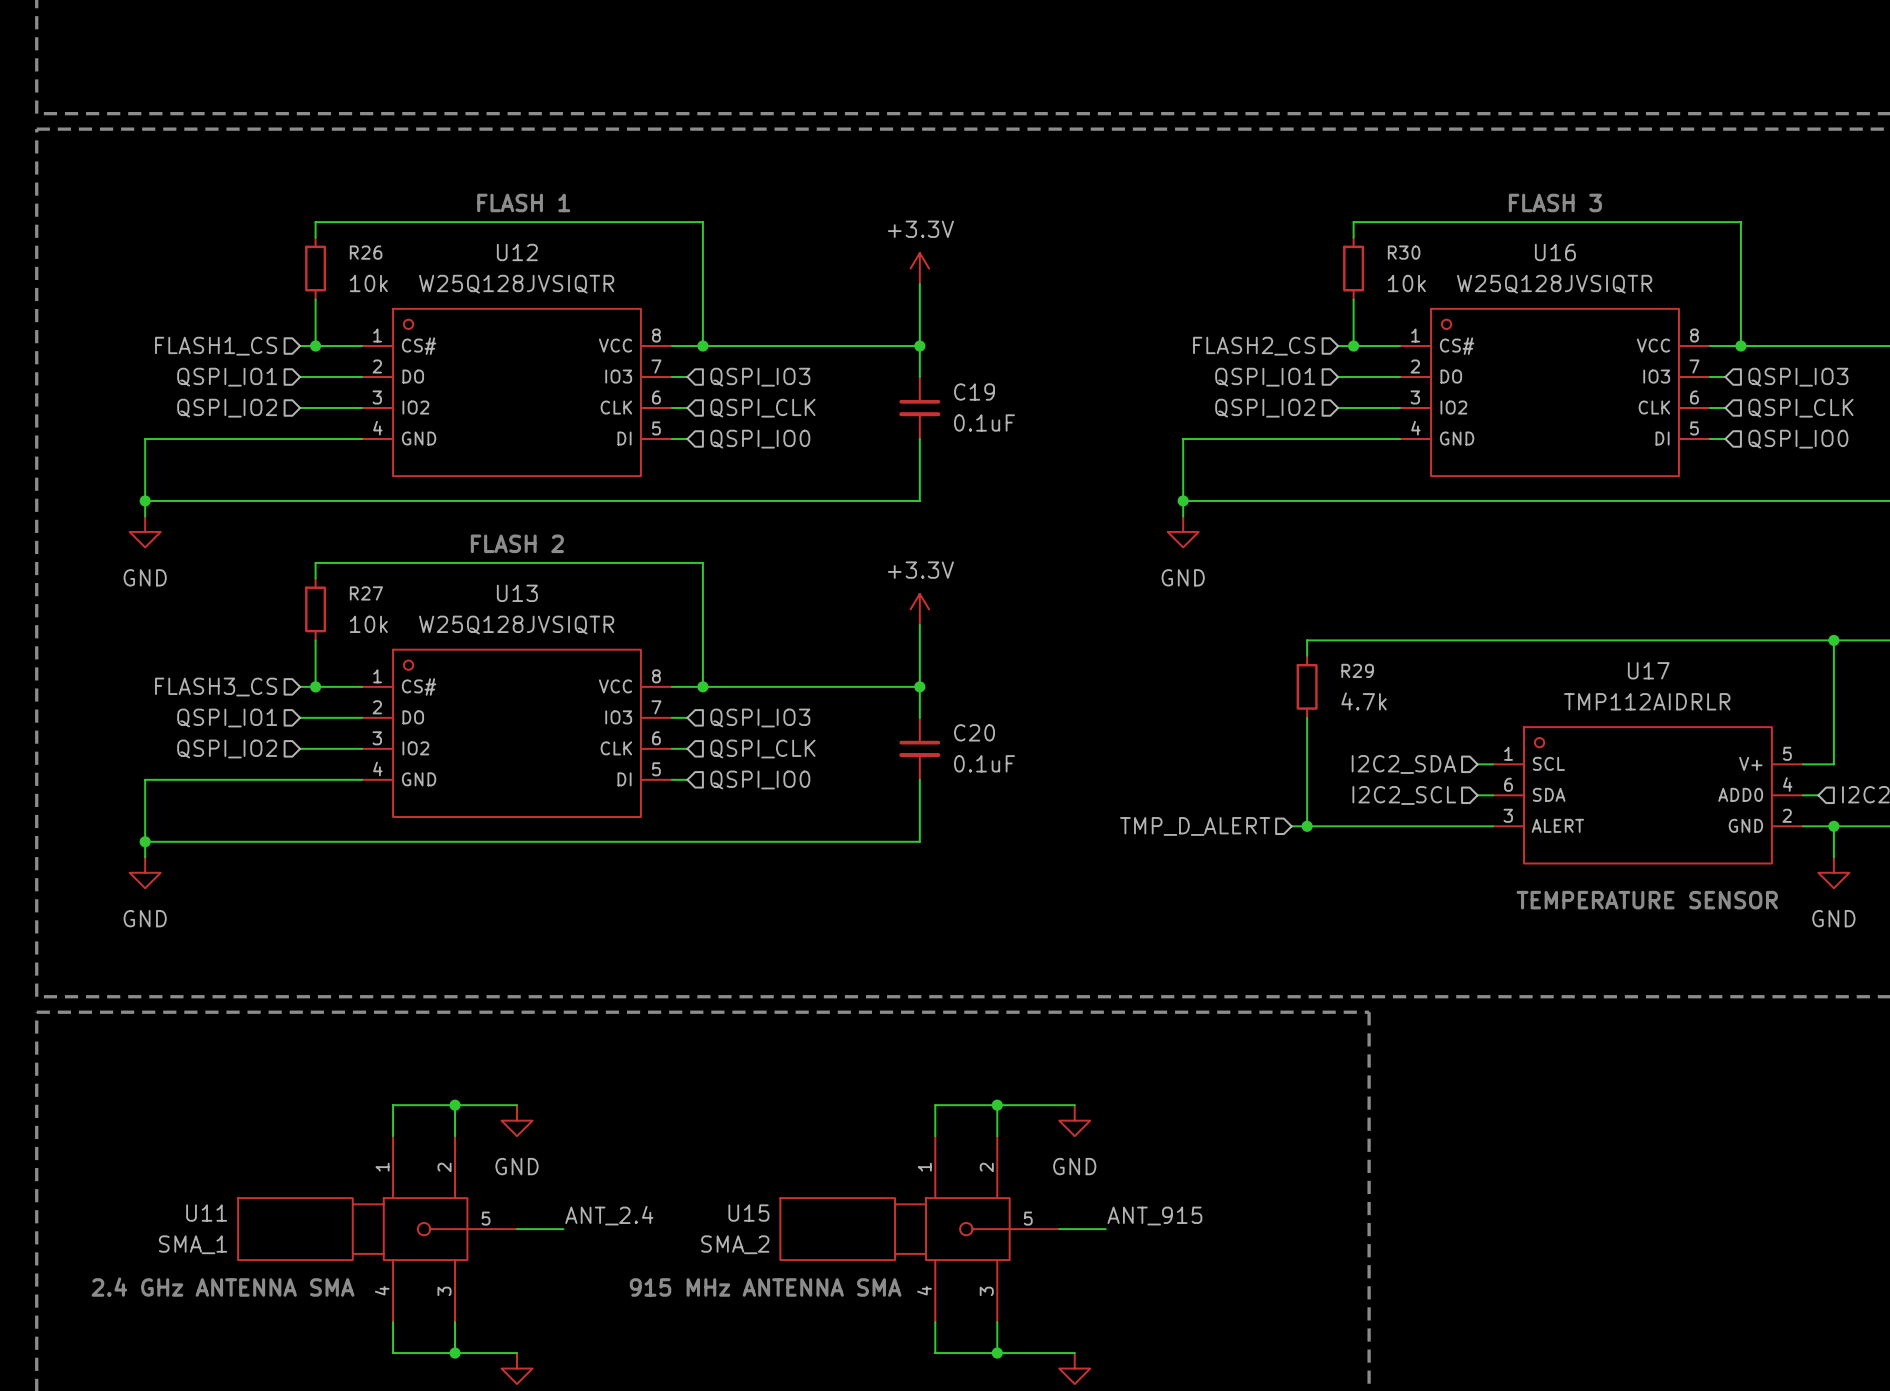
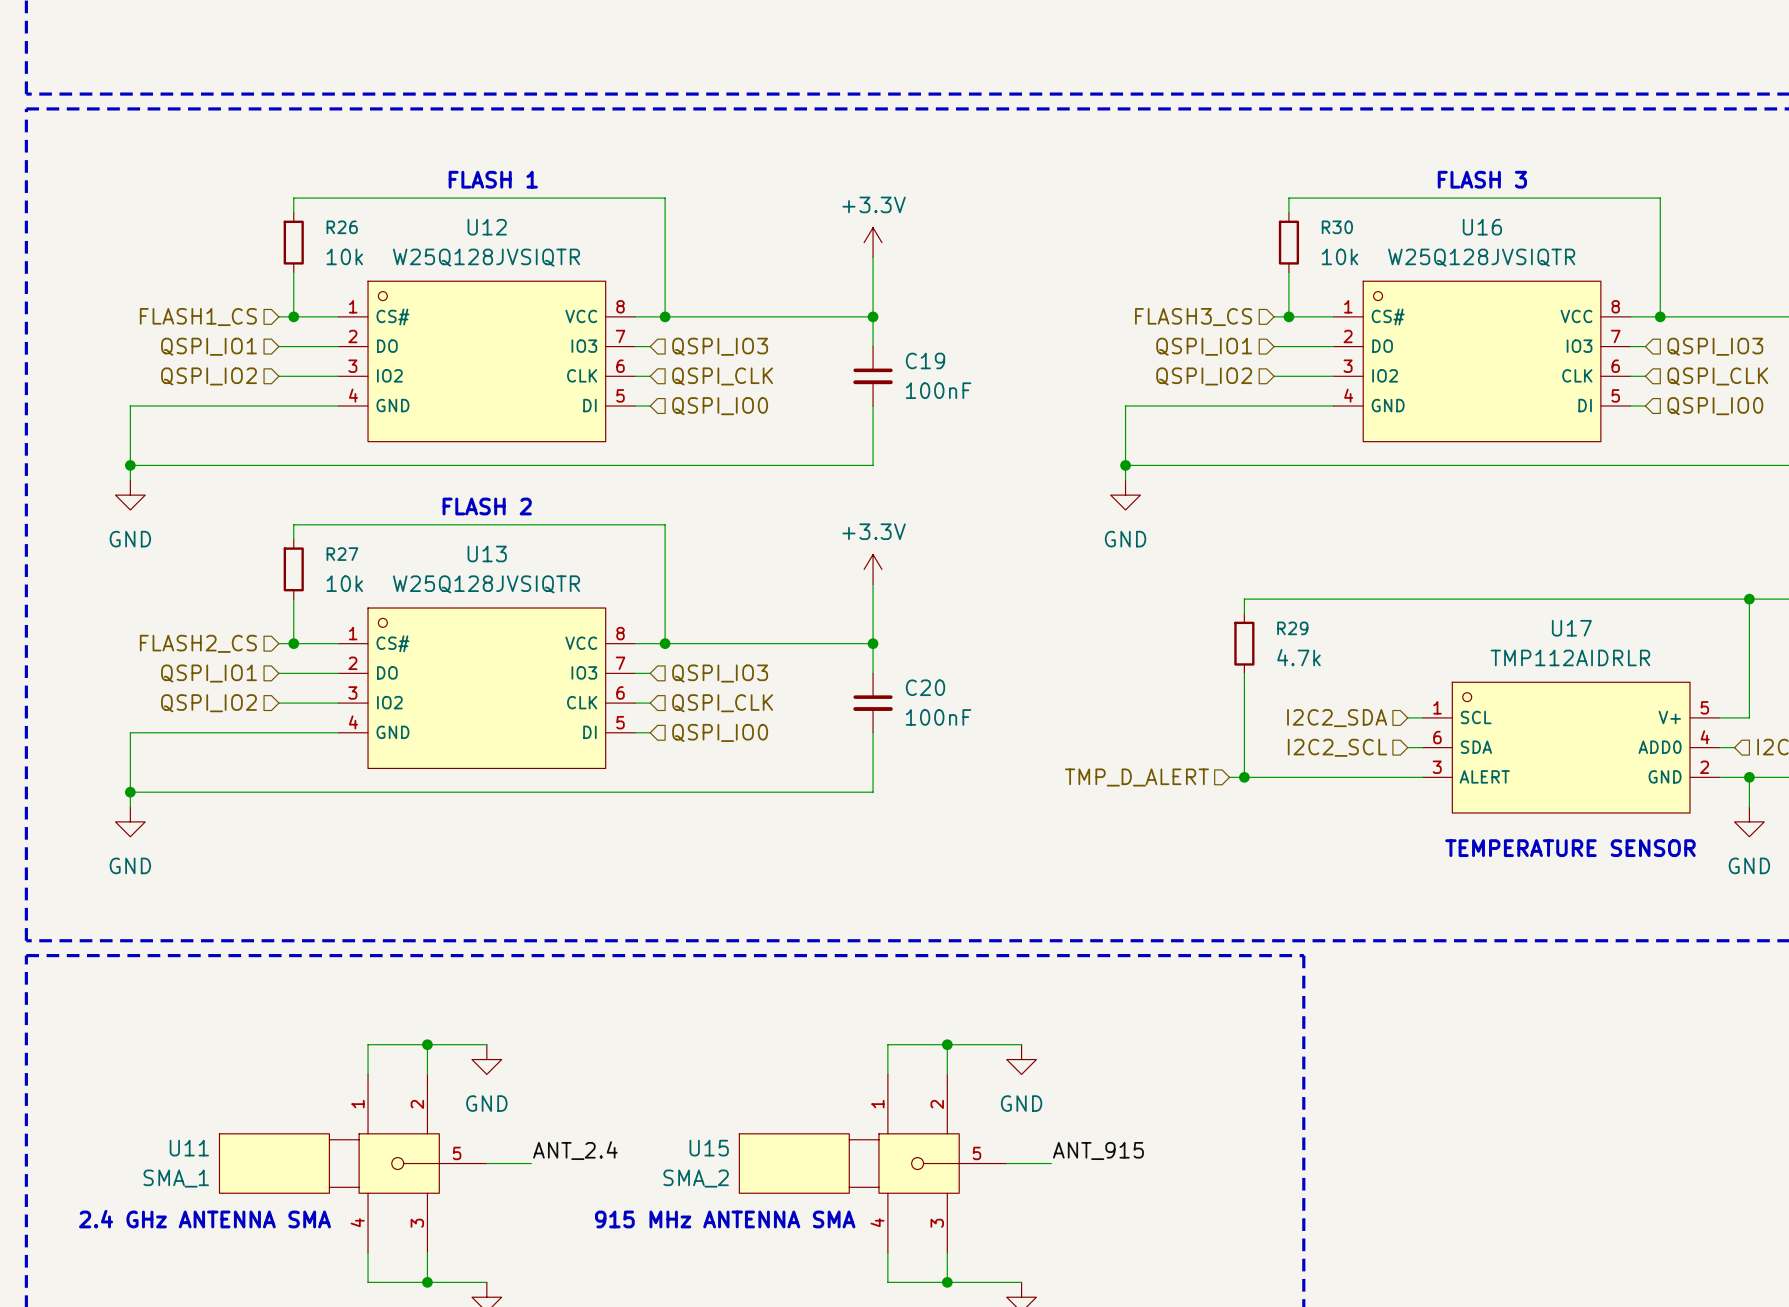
hierarchical label: FLASH2_CS (1254, 346) -> FLASH3_CS (1193, 317)
C19 value: 0.1uF (984, 422) -> 100nF (938, 390)
hierarchical label: FLASH3_CS (216, 687) -> FLASH2_CS (198, 643)
C20 value: 0.1uF (984, 763) -> 100nF (938, 717)

